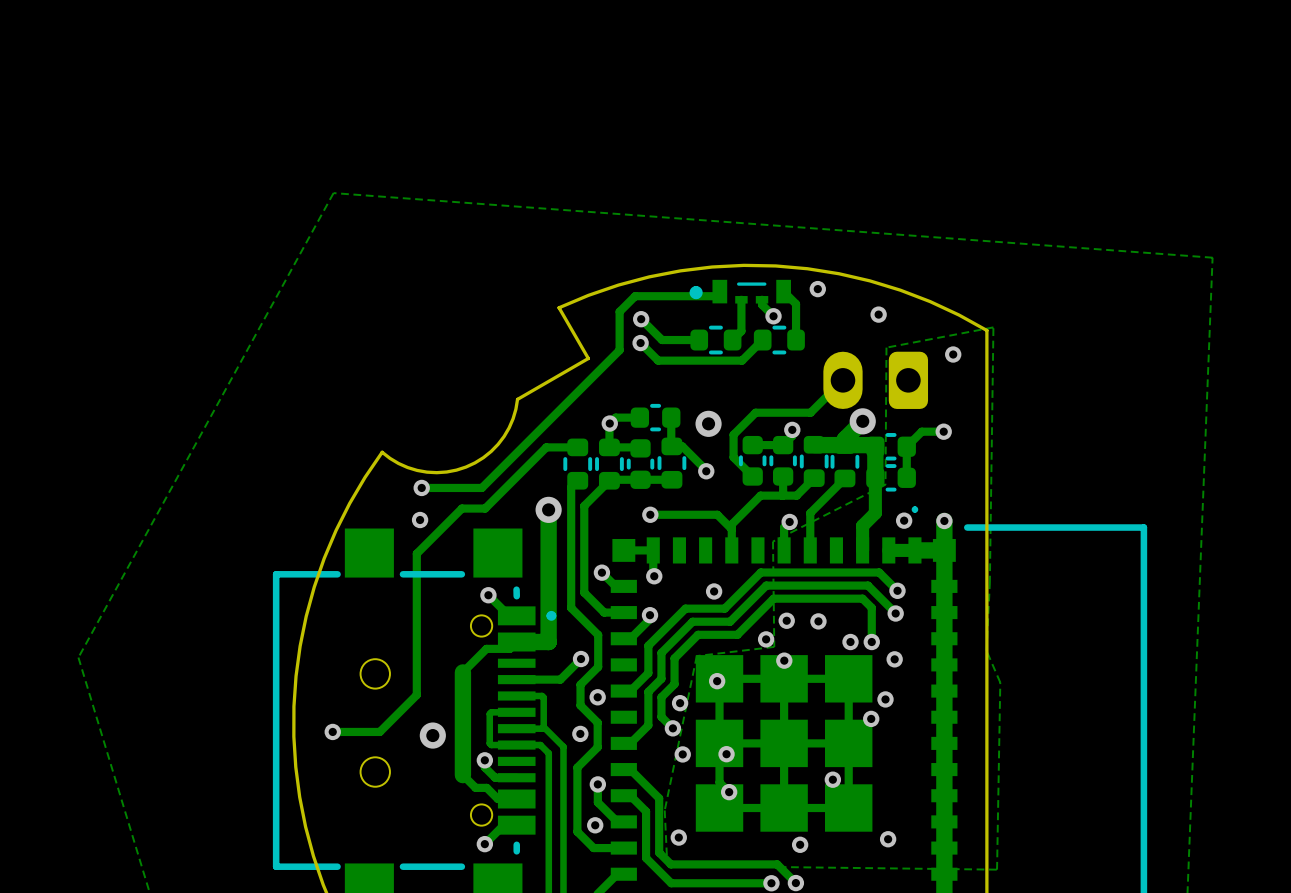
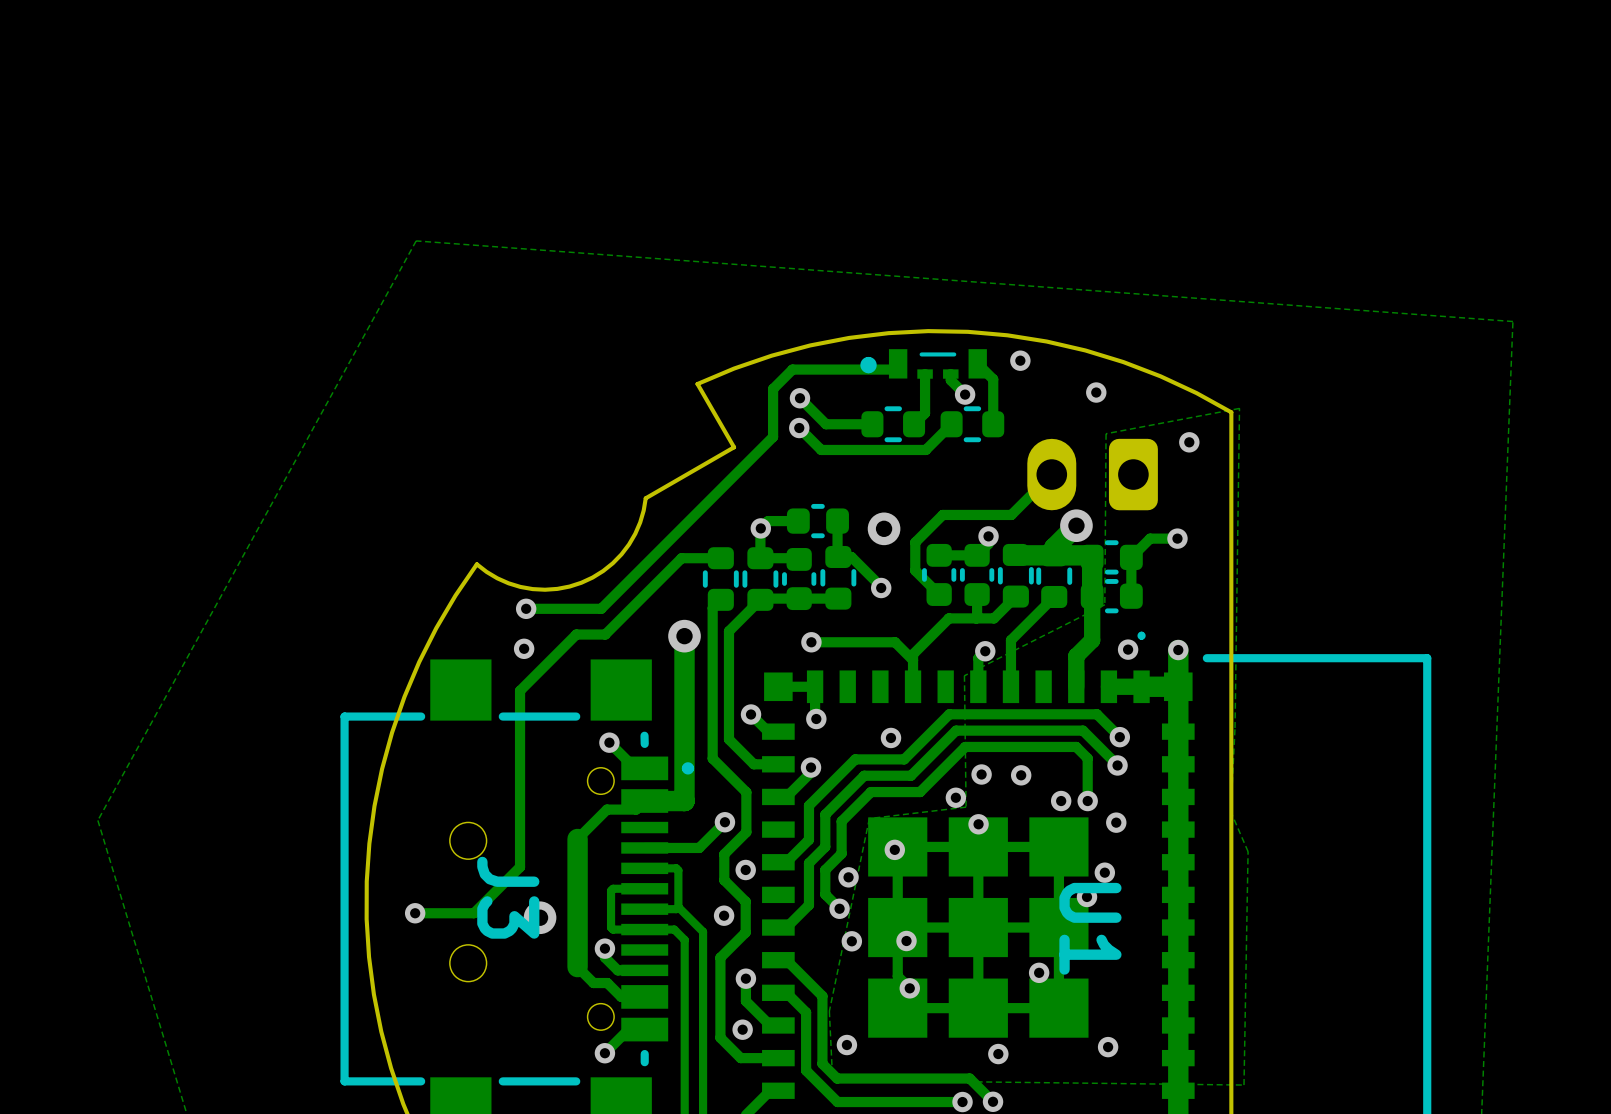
J3 name: none -> J3 (508, 897)
U1 name: none -> U1 (1090, 928)

